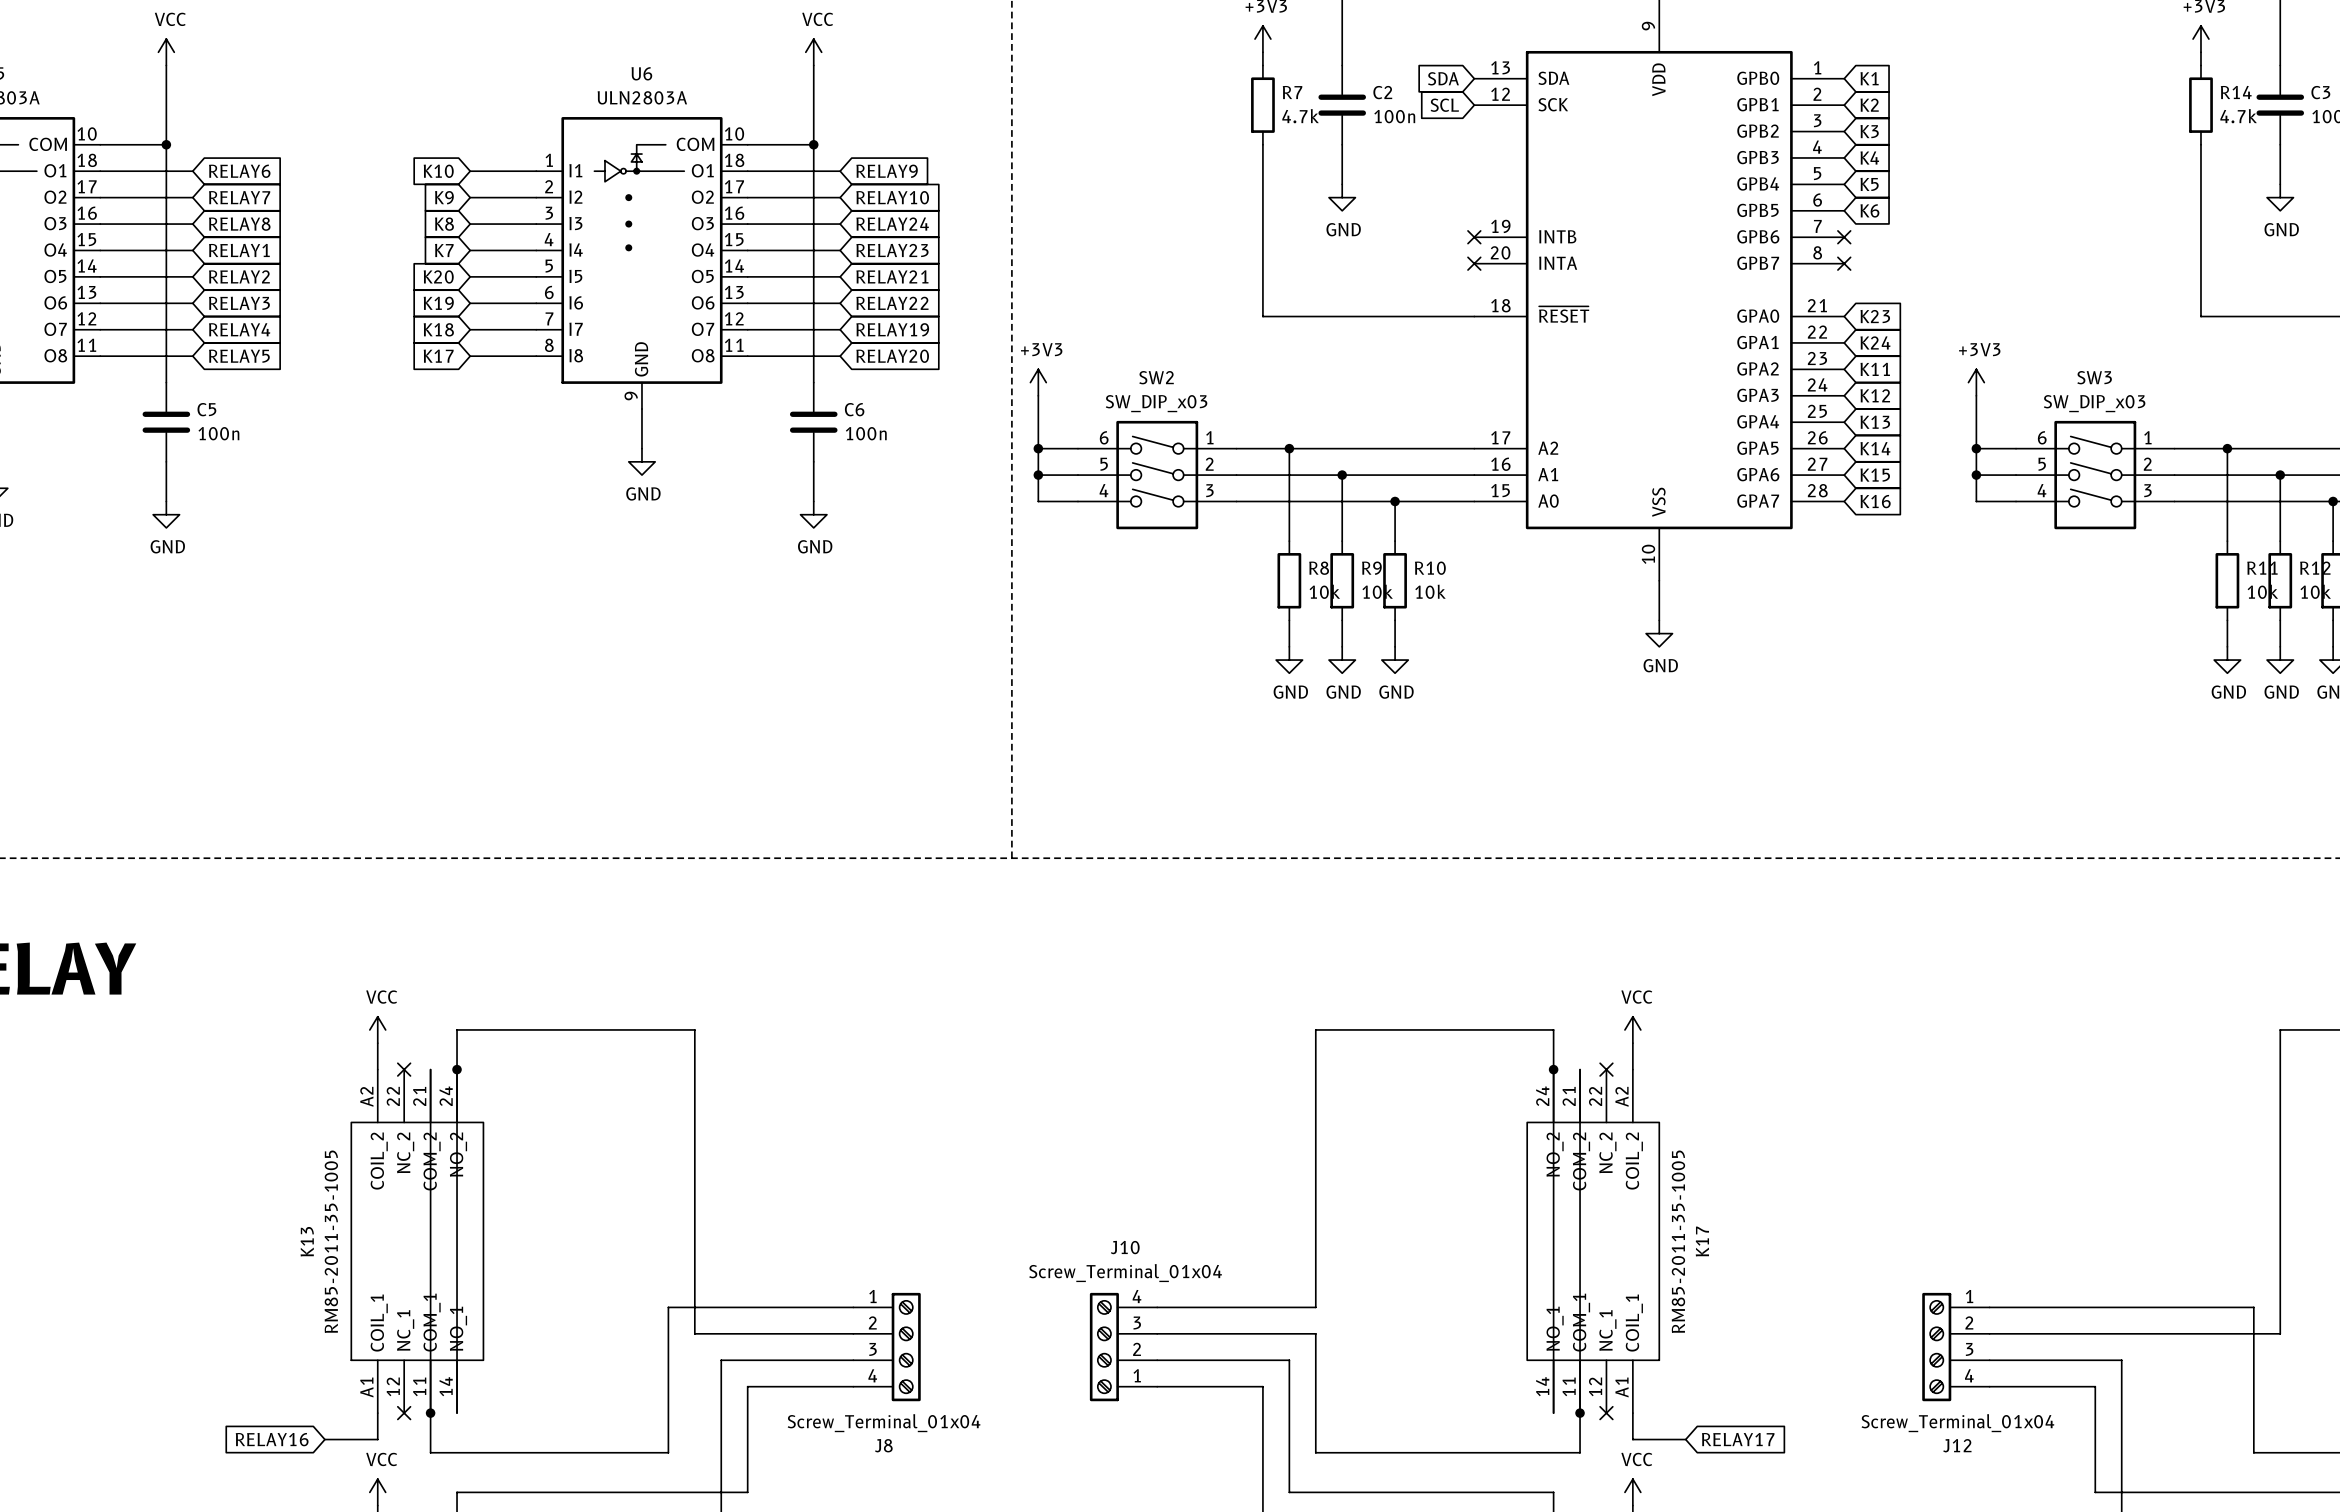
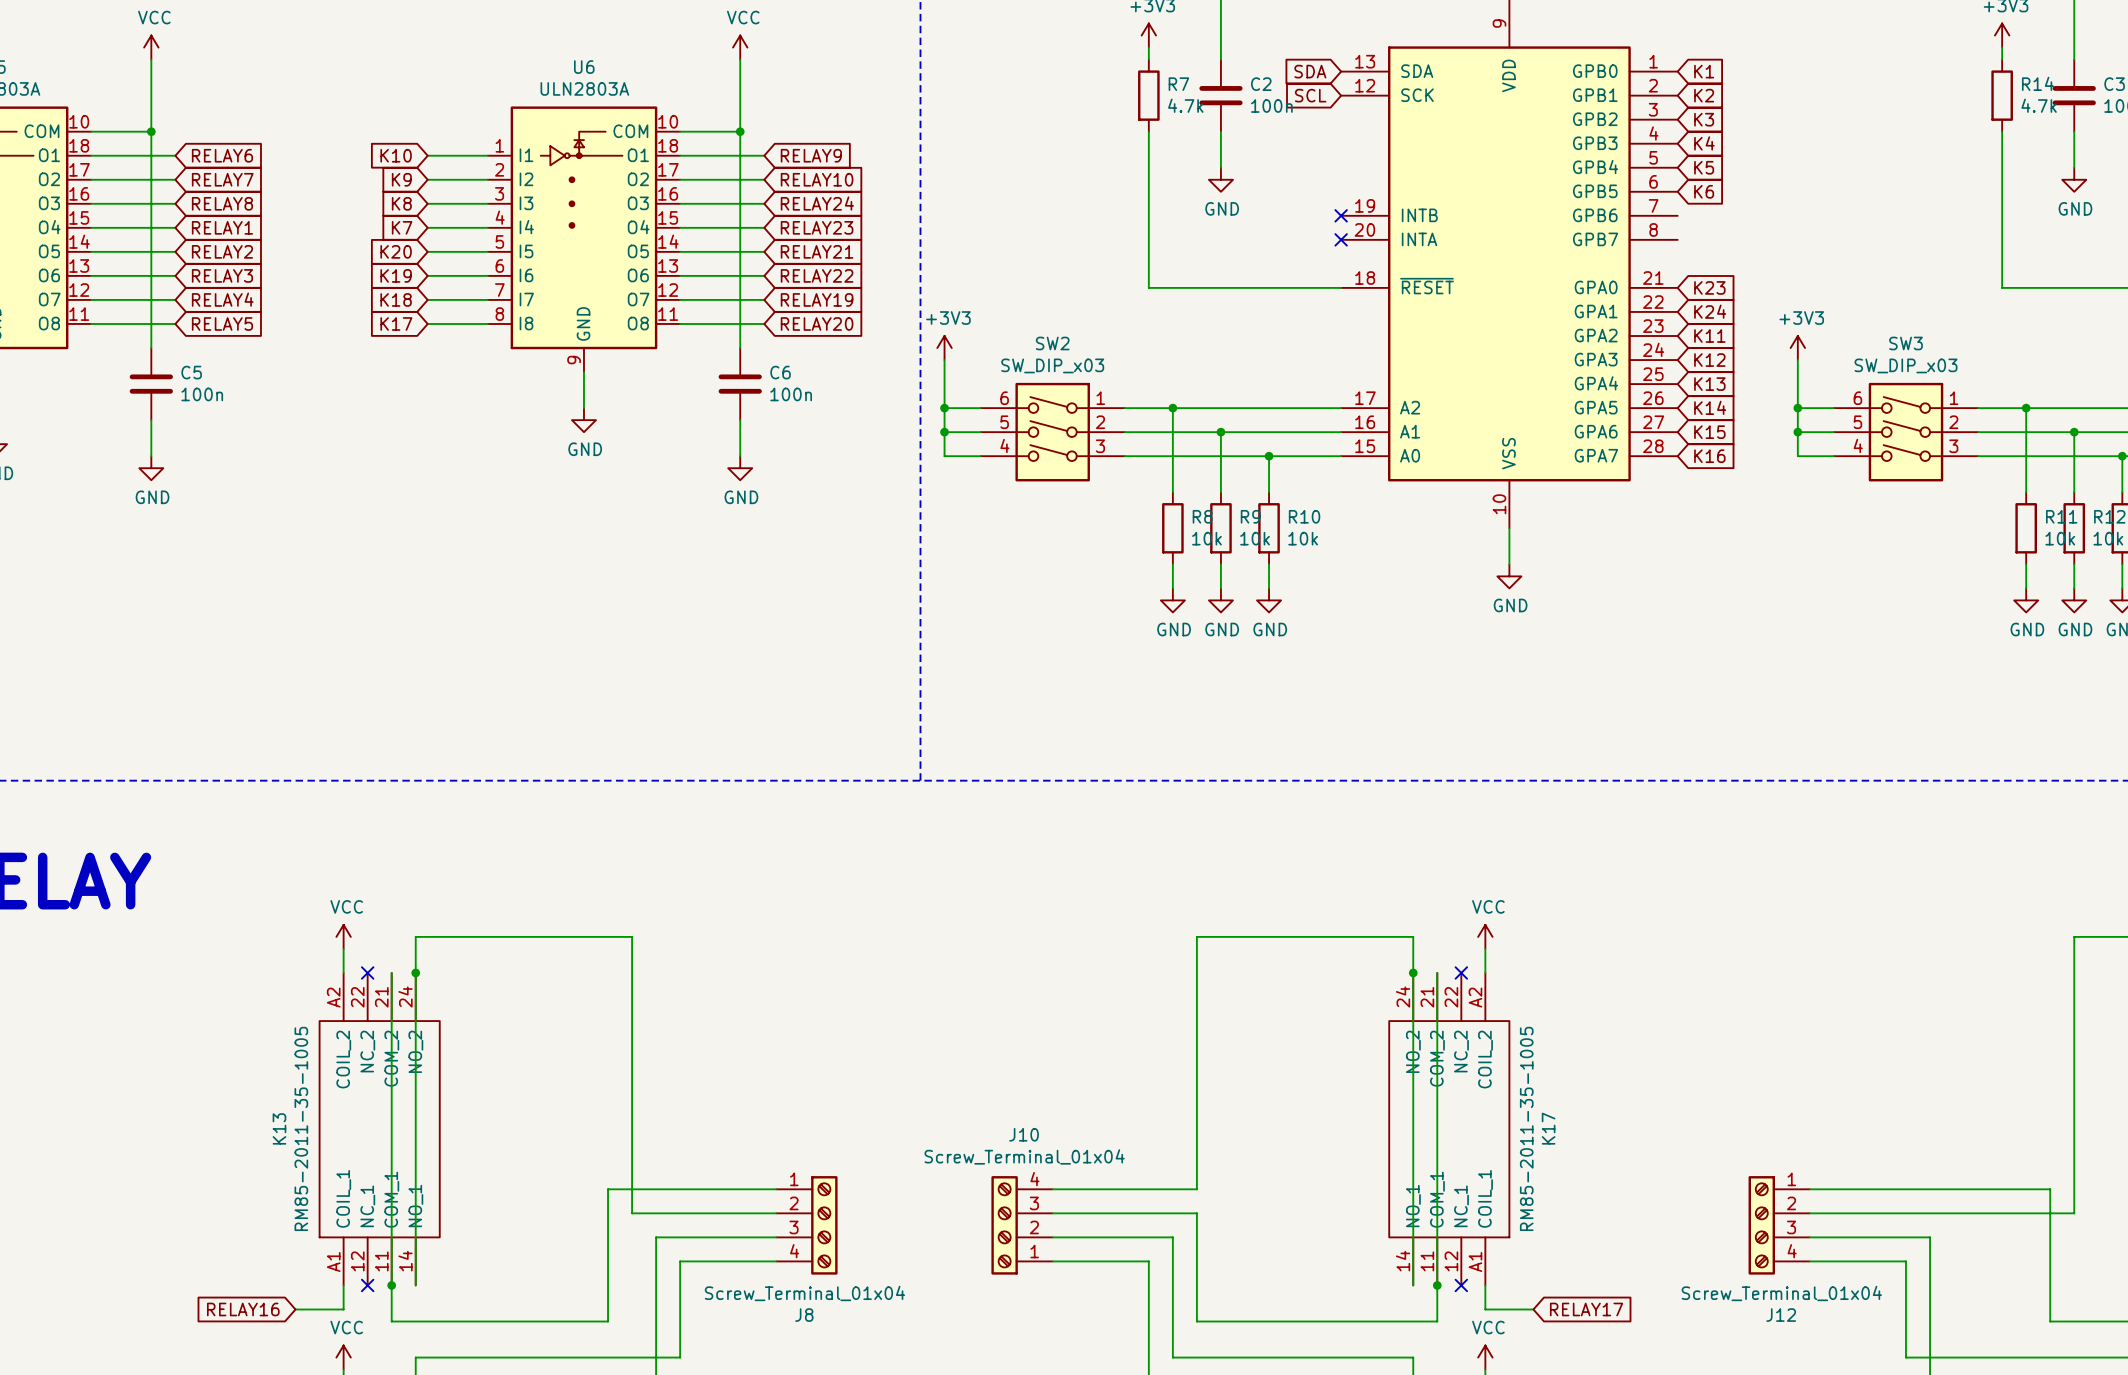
no-connect mark: (1844, 237) -> none
no-connect mark: (1844, 263) -> none

